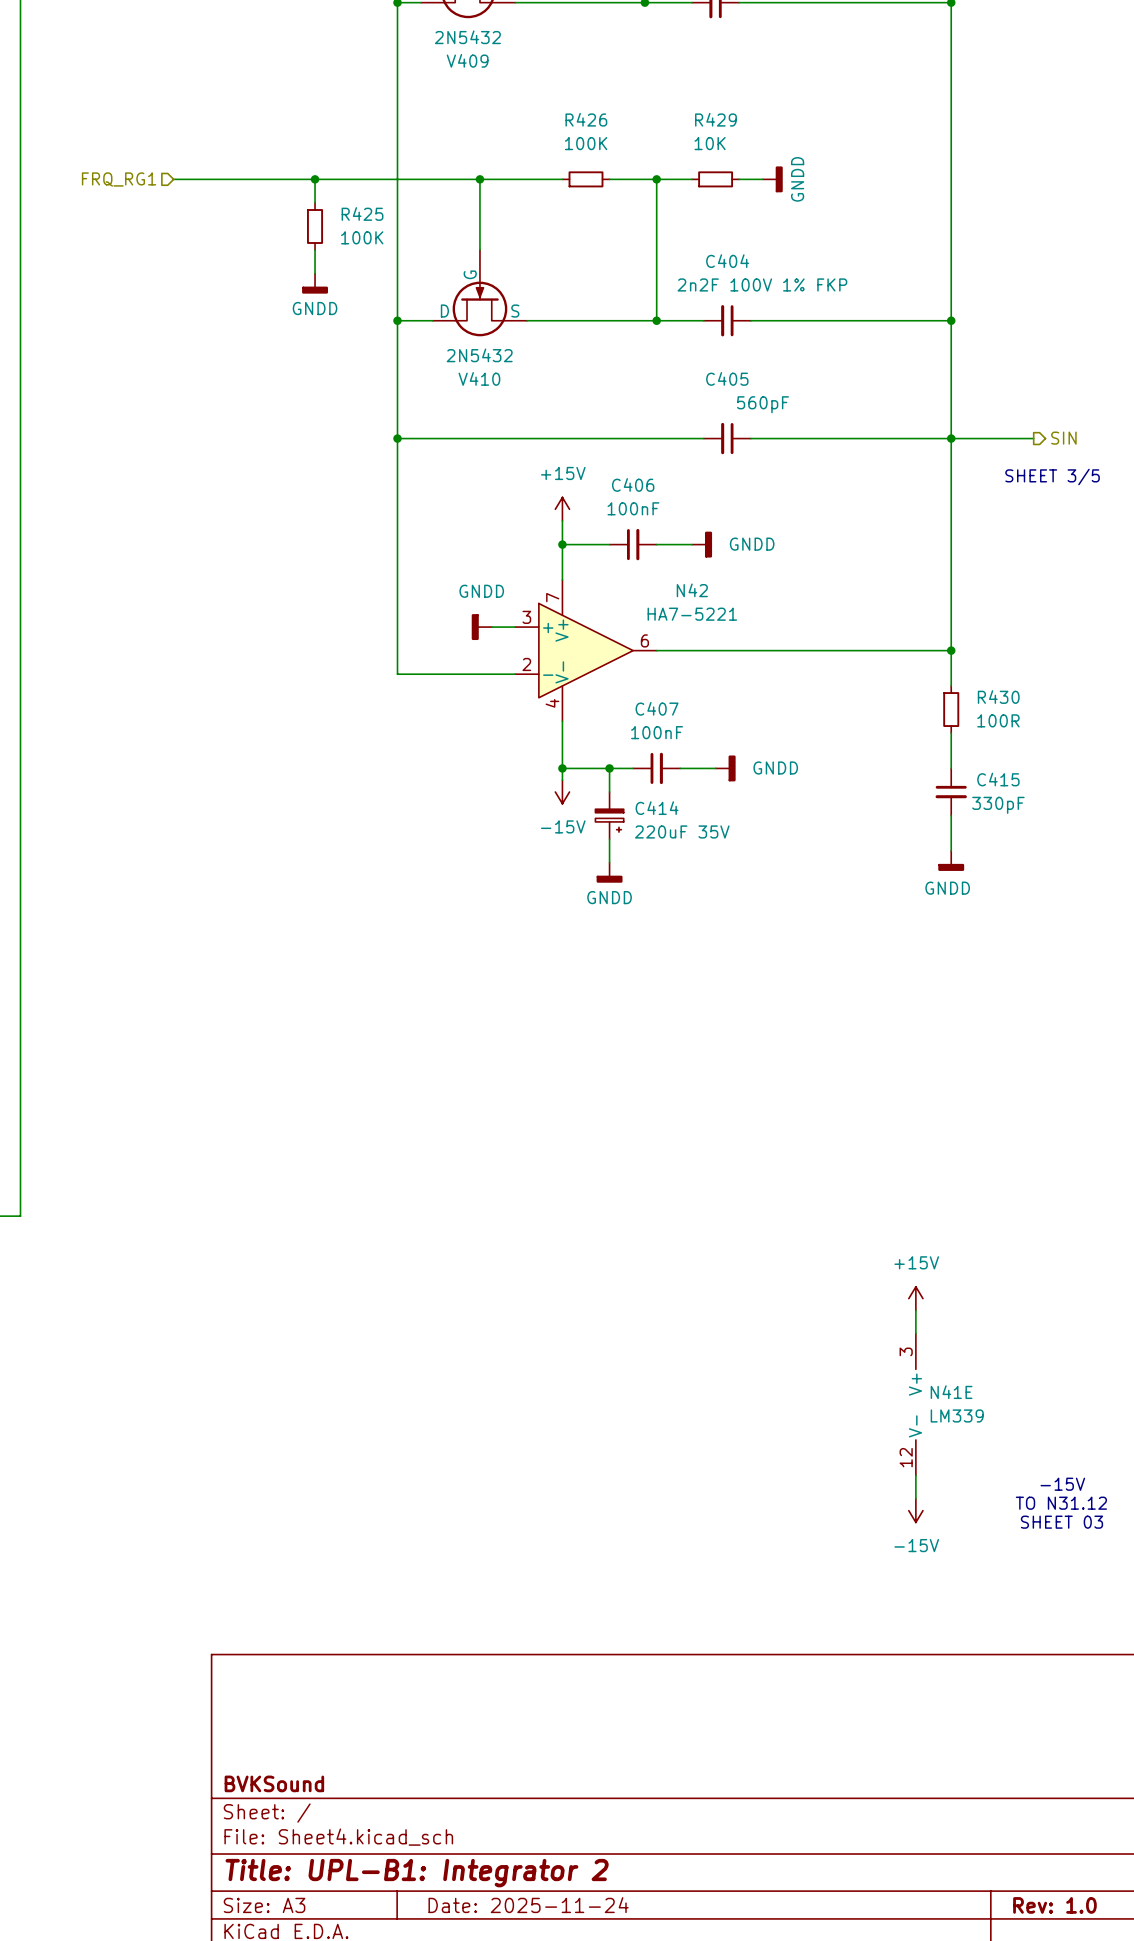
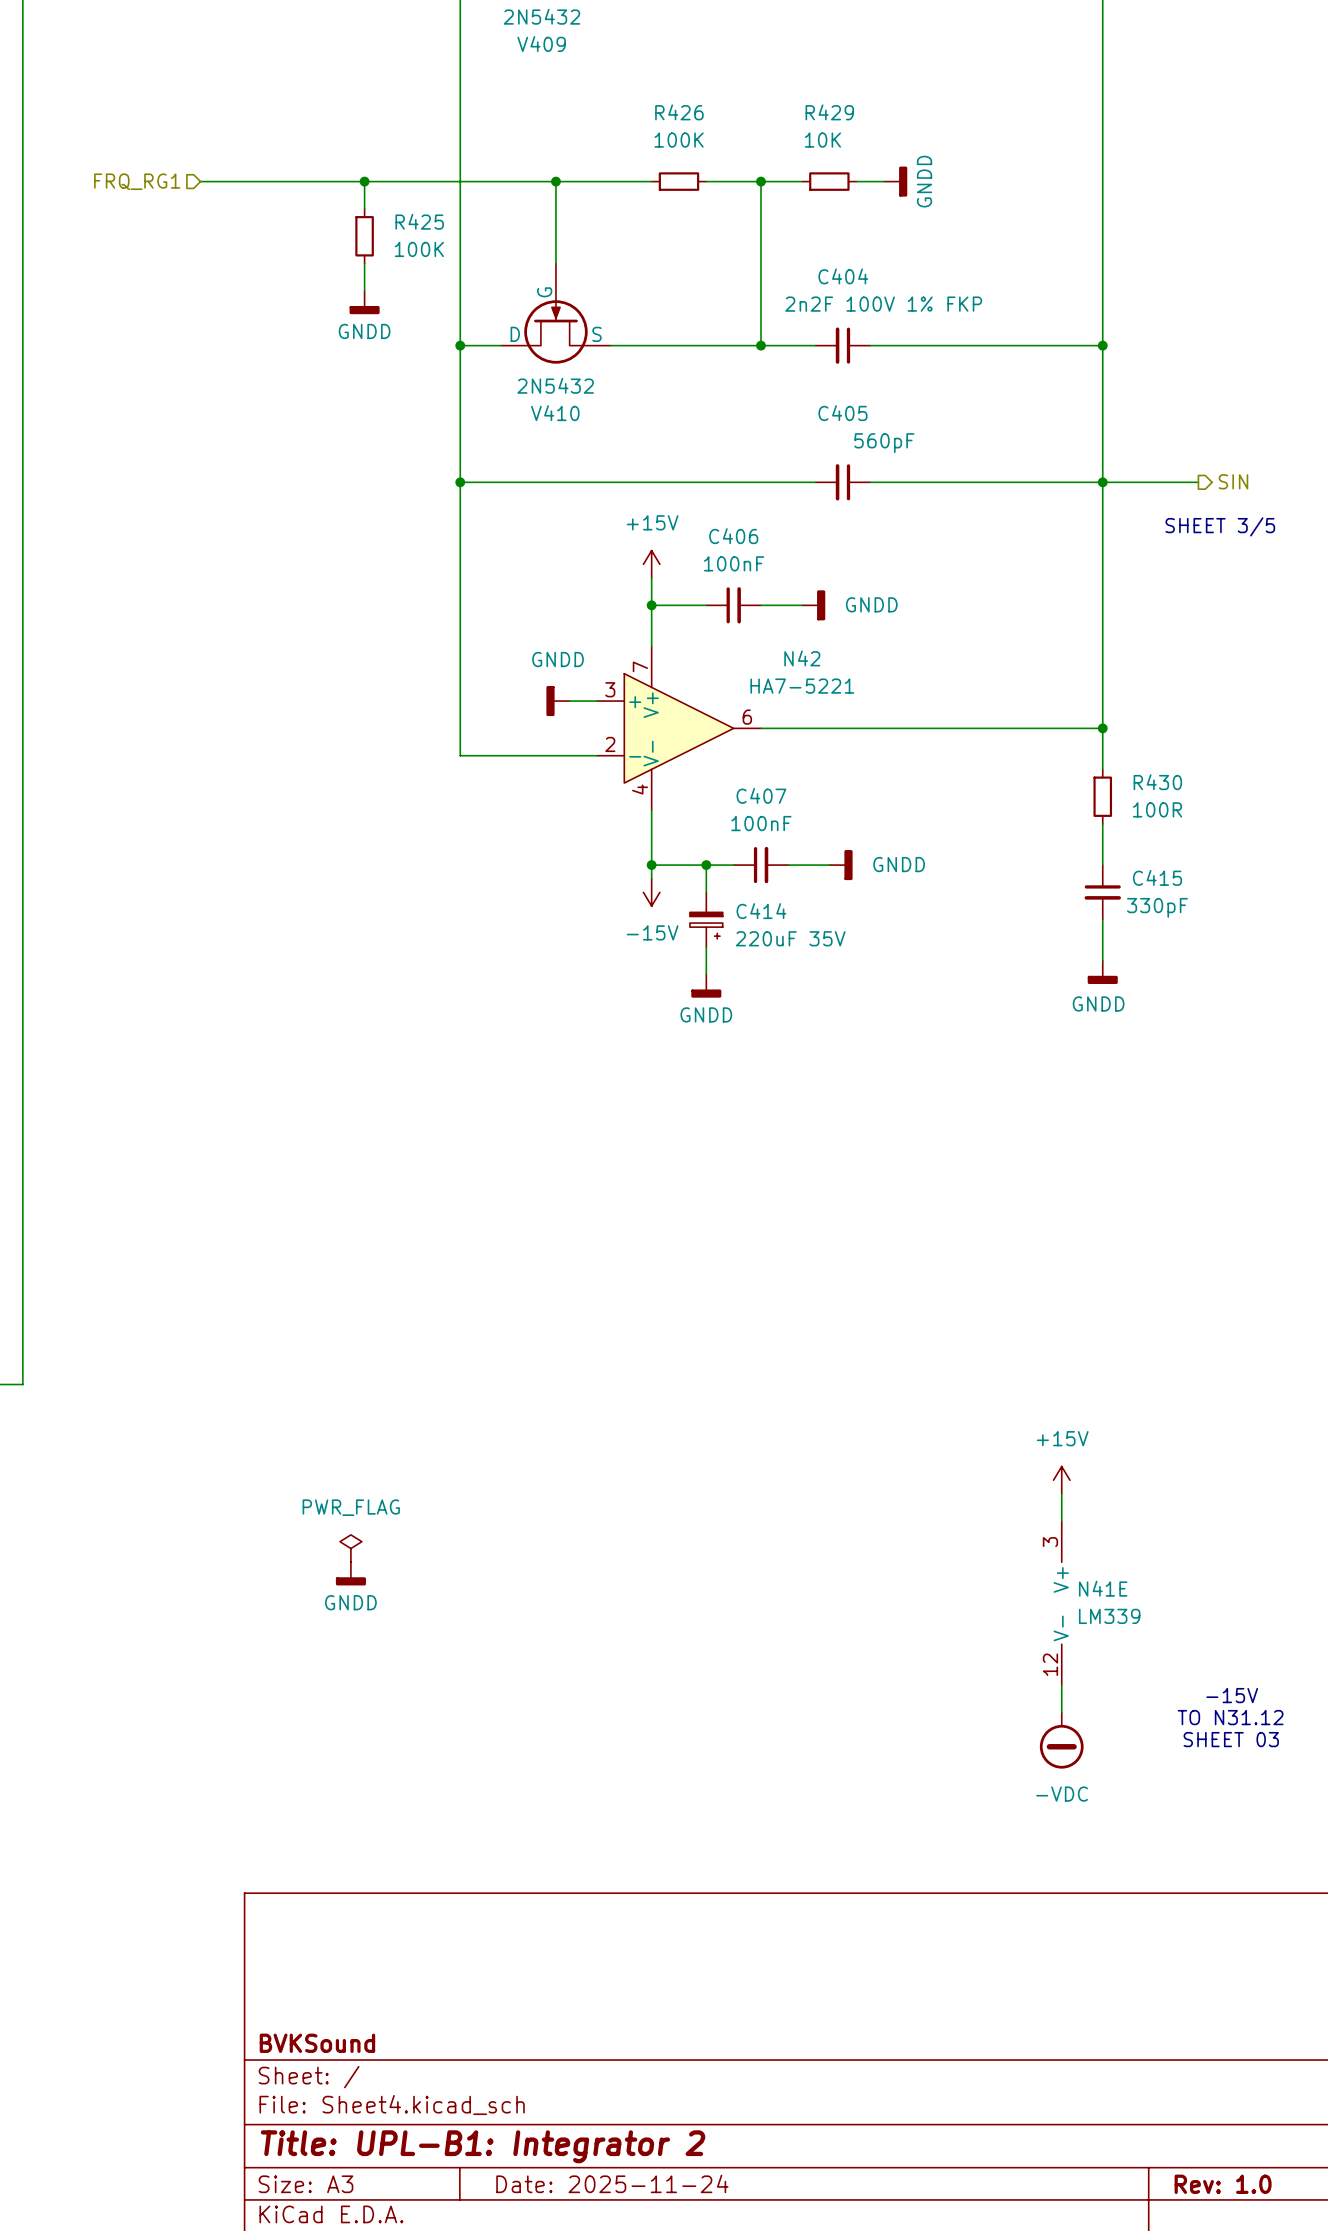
power symbol: none -> PWR_FLAG (350, 1548)
power symbol: none -> GNDD (350, 1573)
power symbol: -15V (915, 1510) -> none
power symbol: none -> -VDC (1061, 1740)

